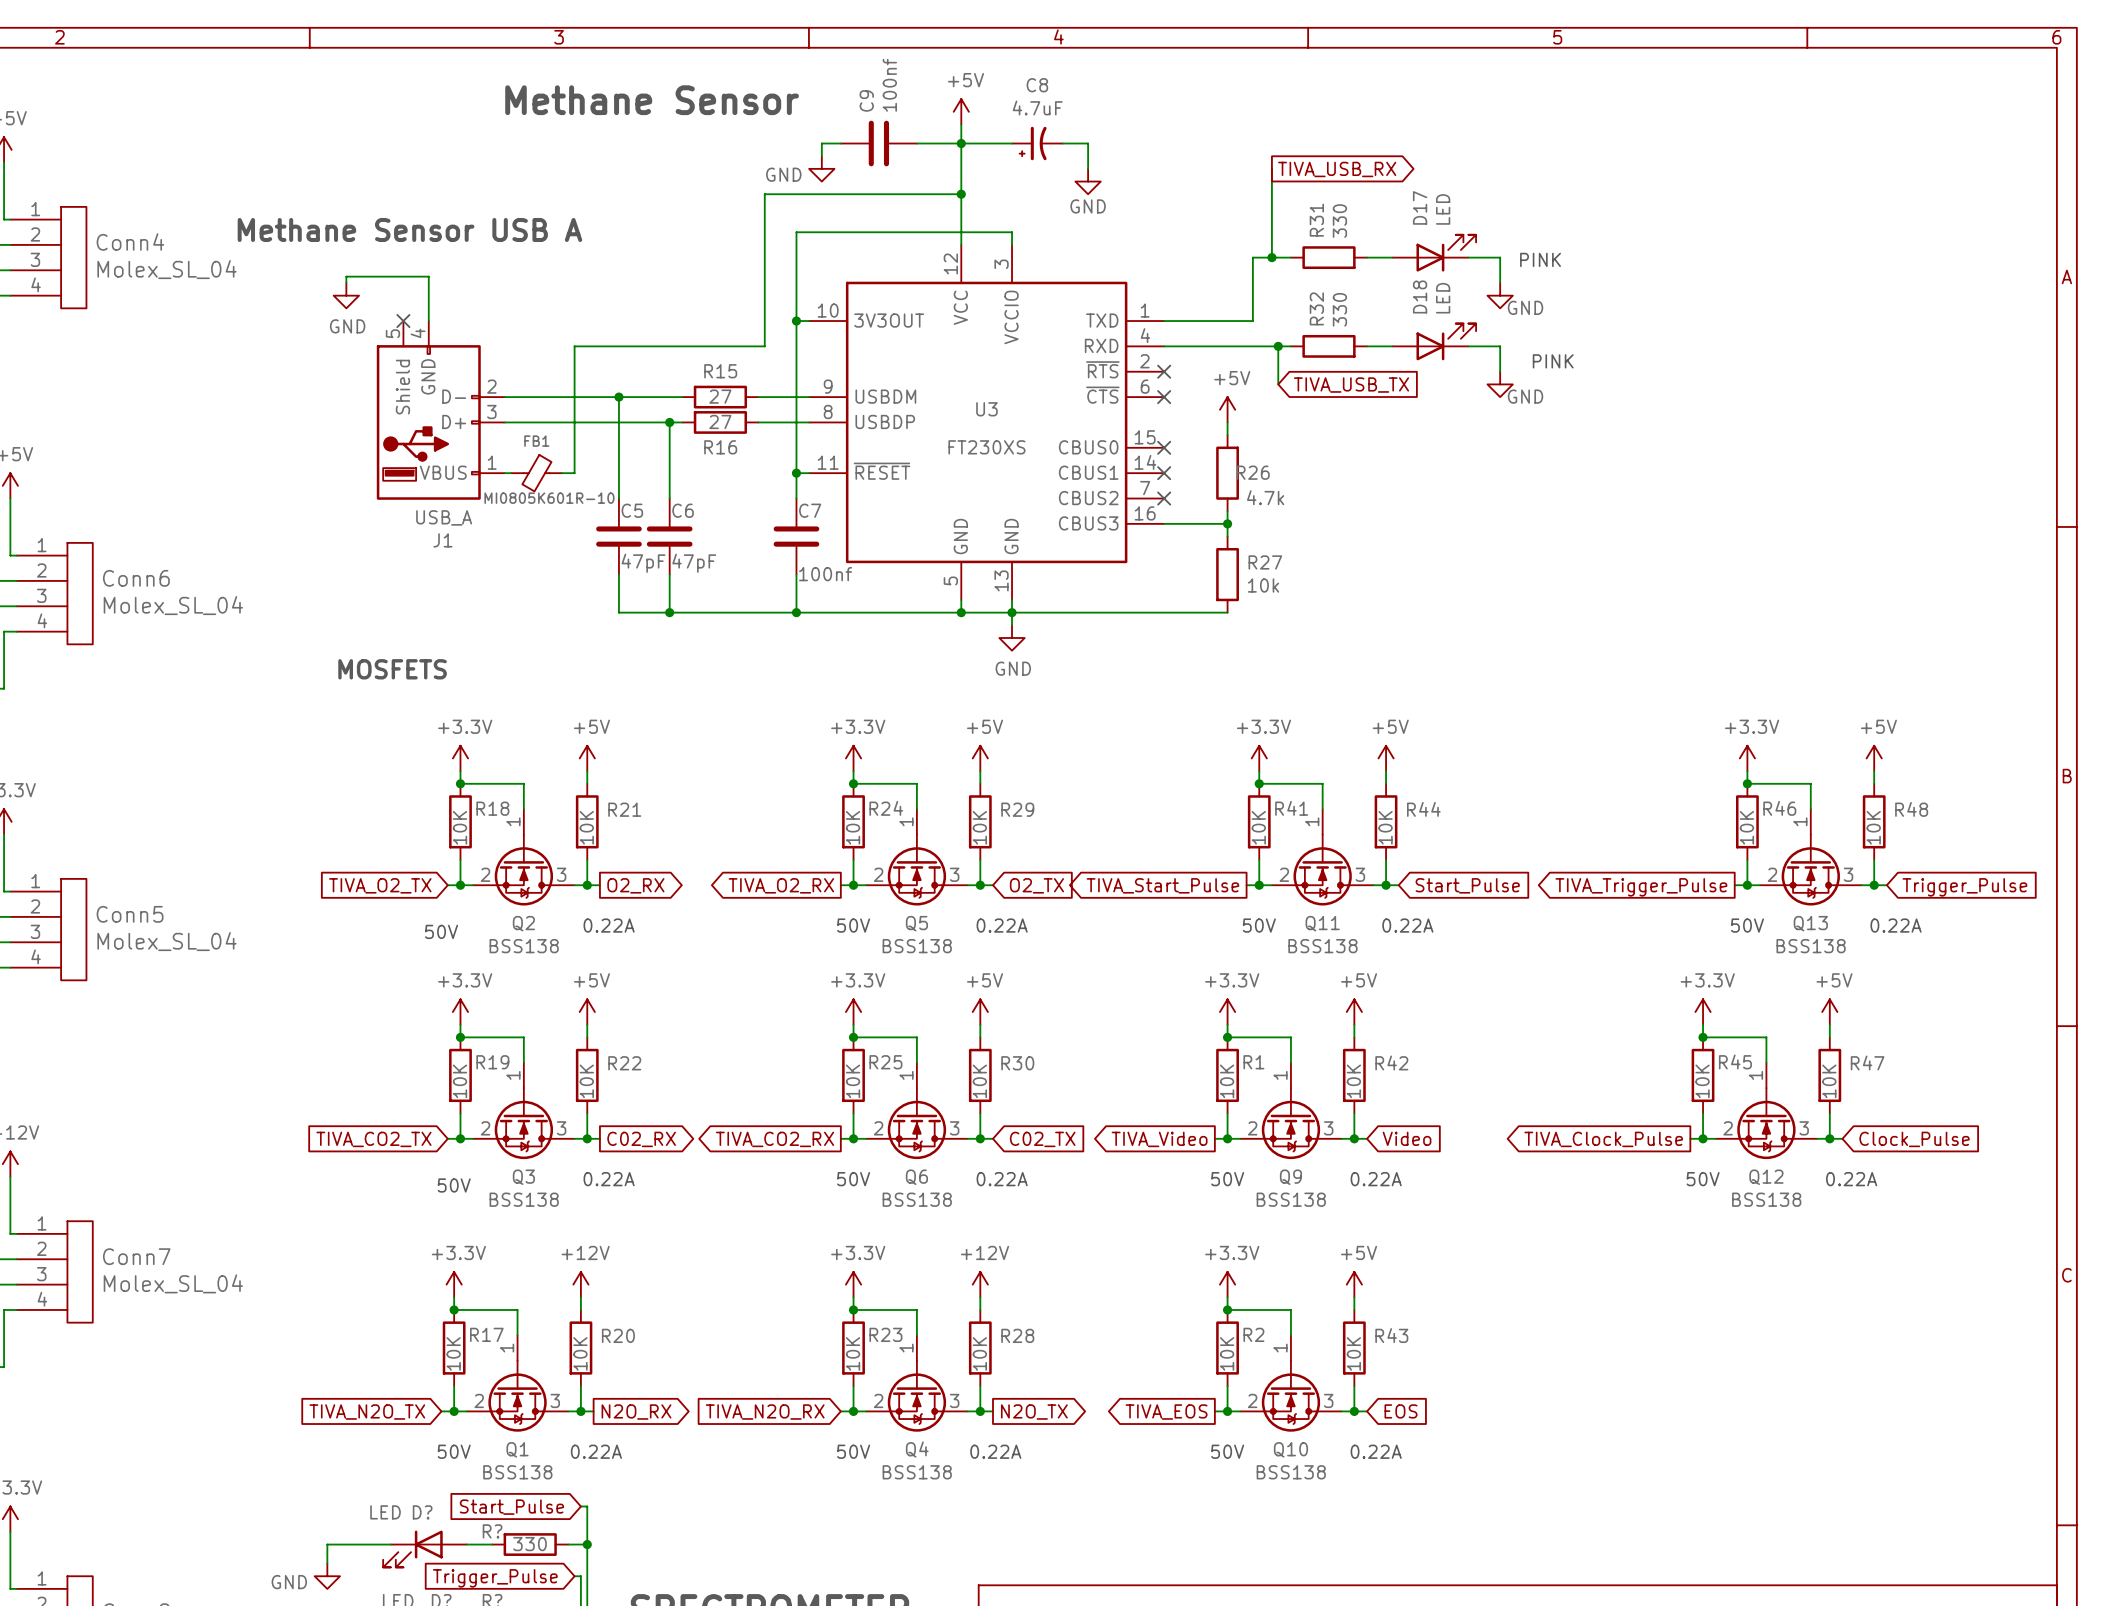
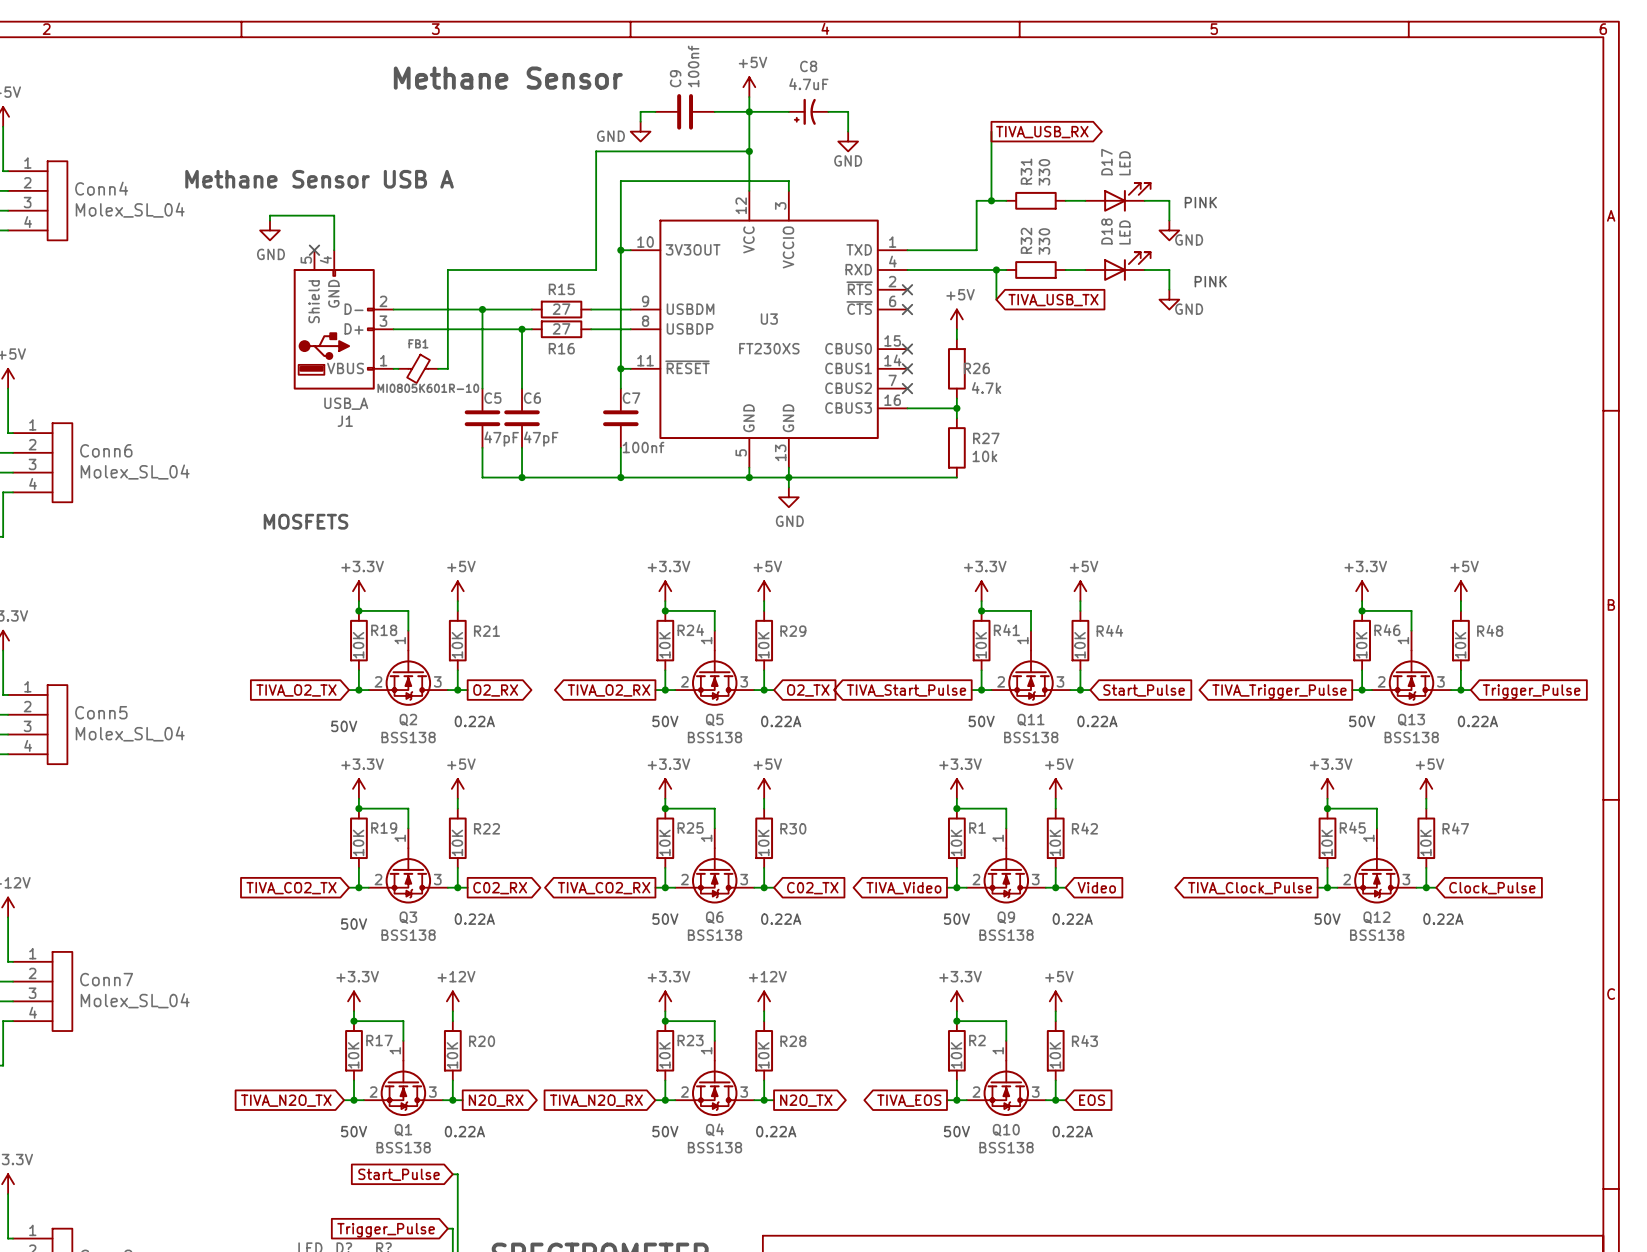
wire: (390, 1544) (327, 1544) (327, 1563) -> none
wire: (466, 1544) (492, 1544) -> none
R?: 330 (530, 1544) -> none
wire: (568, 1544) (587, 1544) -> none
junction: (587, 1544) -> none
D?: LED (424, 1548) -> none
power symbol: GND (327, 1576) -> none

